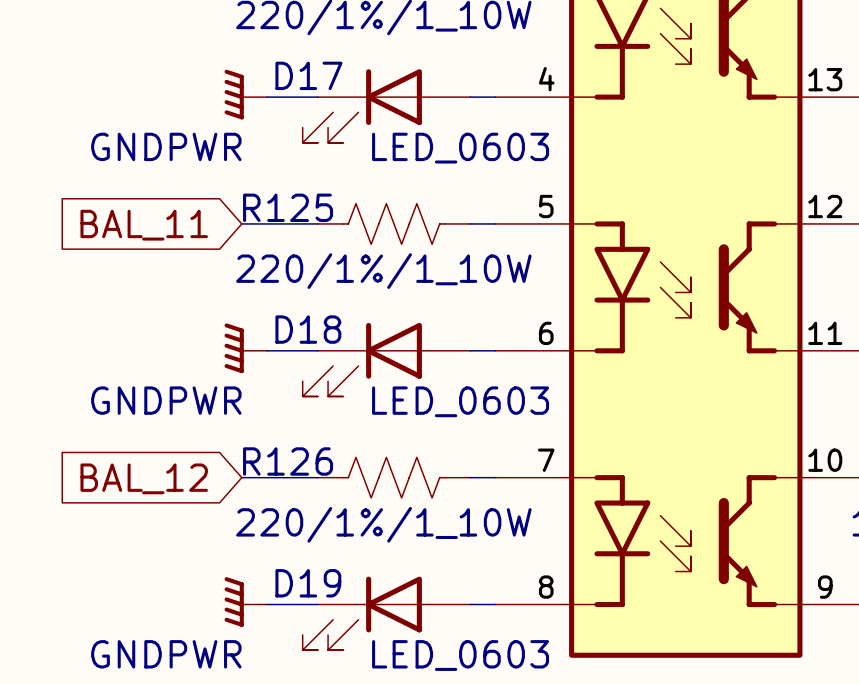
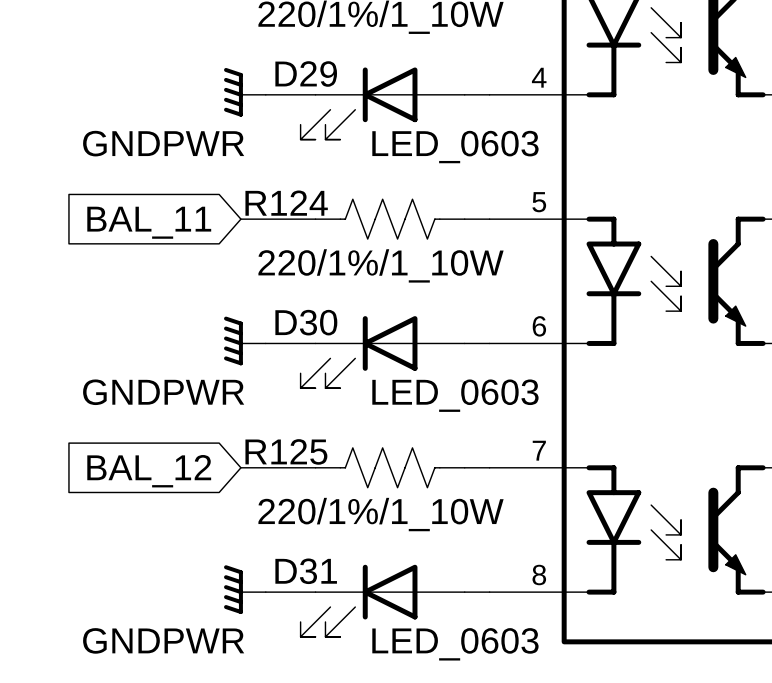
D17 name: D17 (308, 75) -> D29 (306, 73)
R125 name: R125 (288, 207) -> R124 (286, 203)
D18 name: D18 (308, 329) -> D30 (306, 322)
R126 name: R126 (288, 461) -> R125 (286, 451)
D19 name: D19 (308, 583) -> D31 (306, 571)

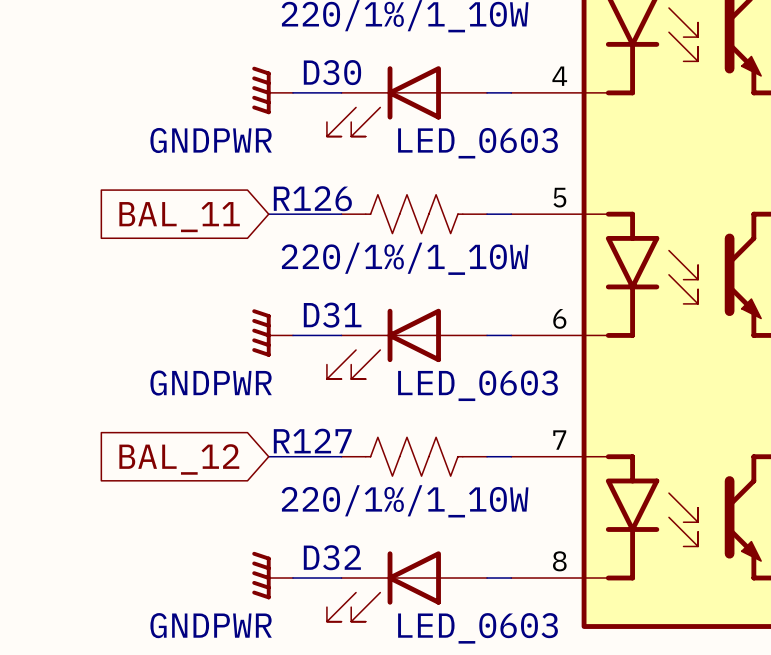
D29 name: D29 (306, 73) -> D30 (332, 72)
R124 name: R124 (286, 203) -> R126 (312, 198)
D30 name: D30 (306, 322) -> D31 (332, 315)
R125 name: R125 (286, 451) -> R127 (312, 441)
D31 name: D31 (306, 571) -> D32 (332, 557)

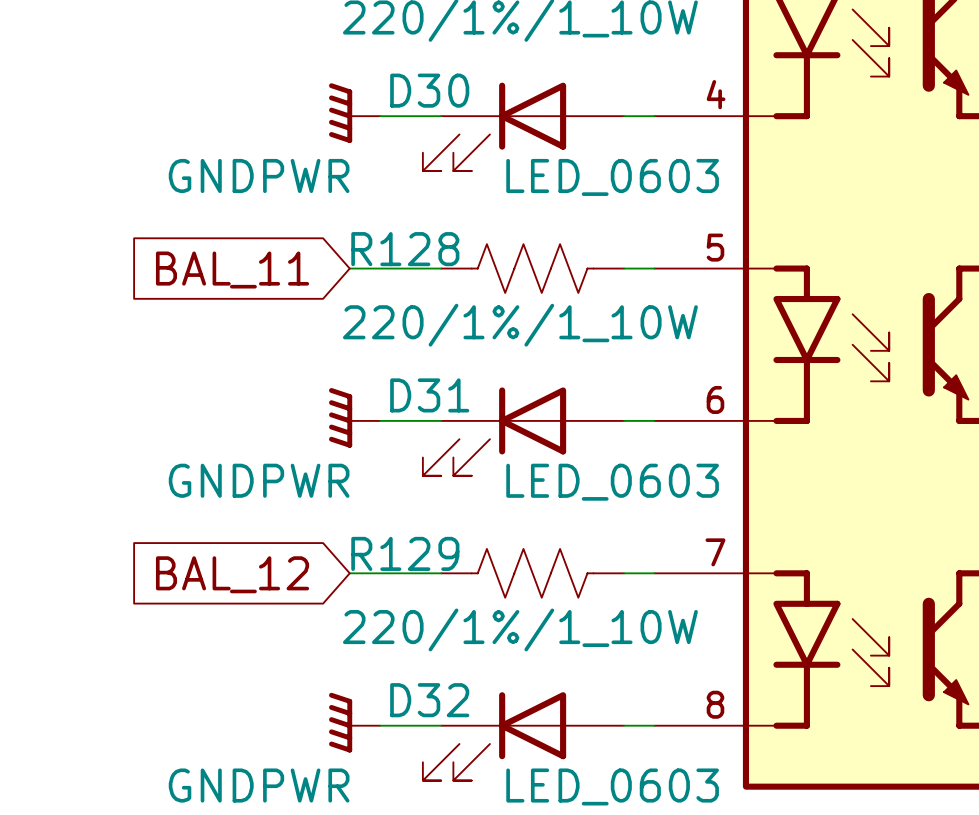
R126 name: R126 (312, 198) -> R128 (405, 249)
R127 name: R127 (312, 441) -> R129 (405, 553)

